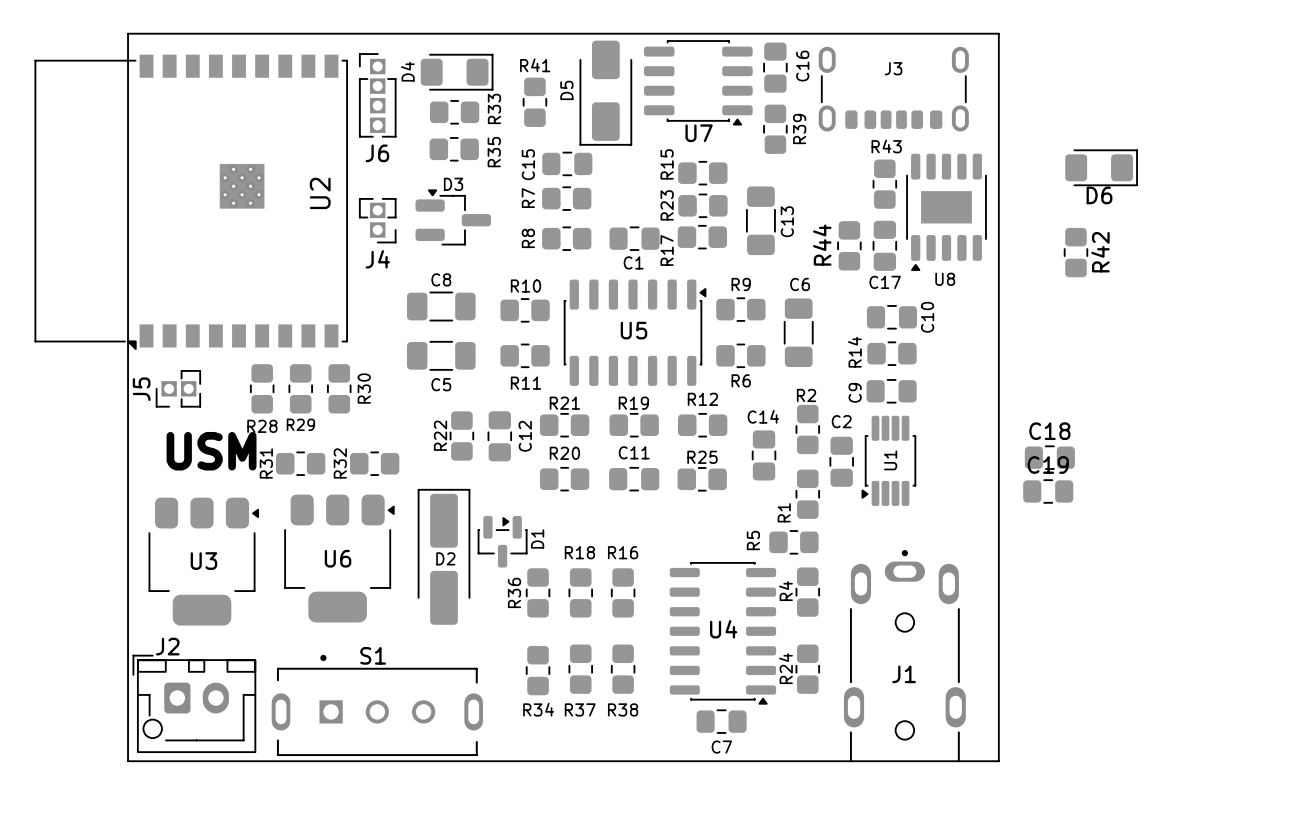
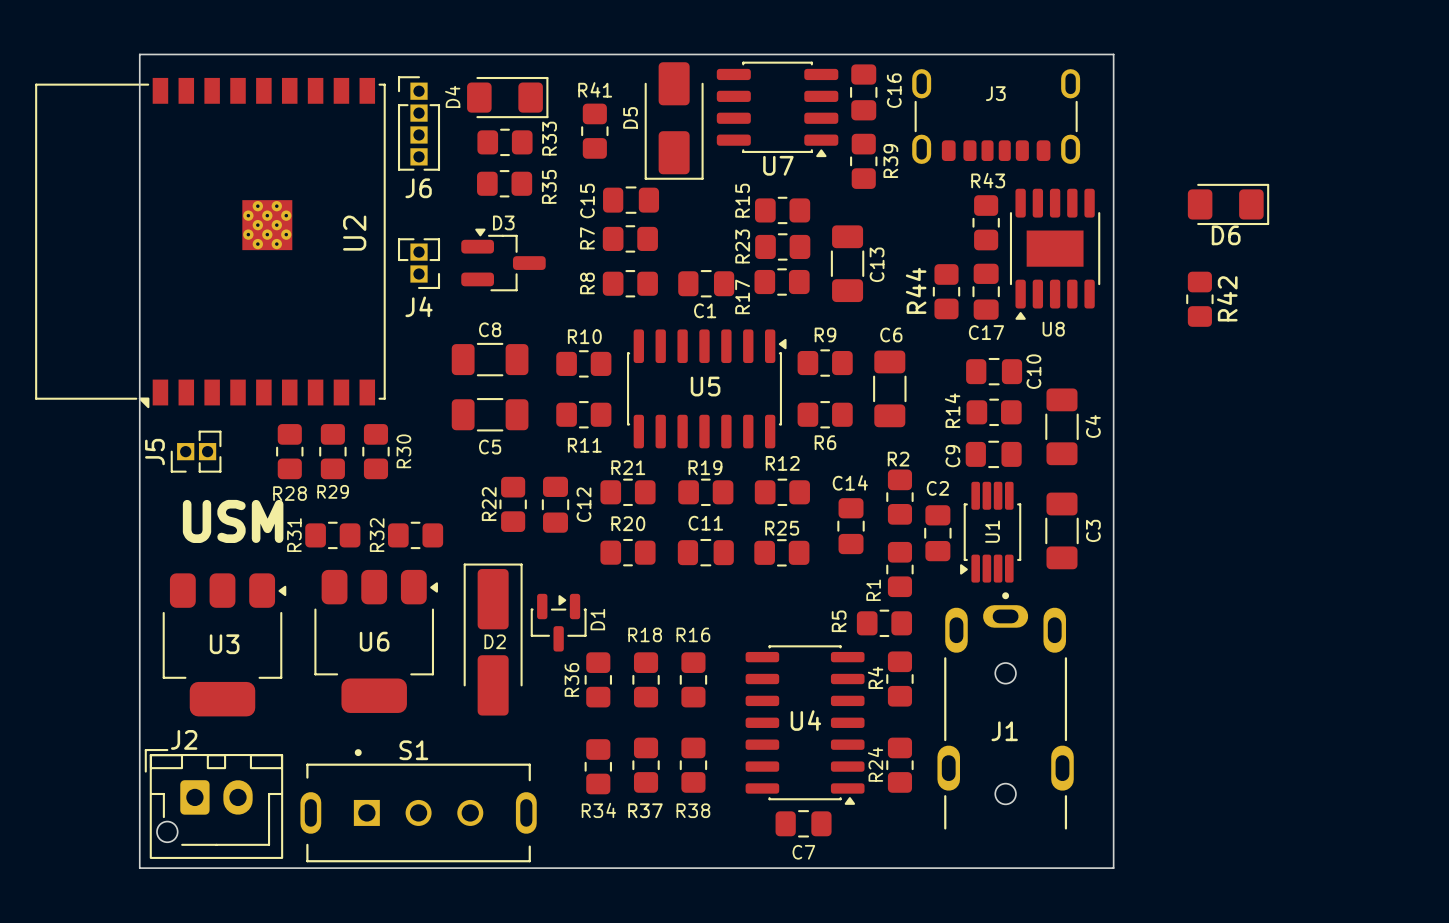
C4: none -> (1061, 426)
C18: (1049, 457) -> none
C3: none -> (1061, 530)
C19: (1048, 491) -> none
J1 position: (904, 656) -> (1005, 710)

